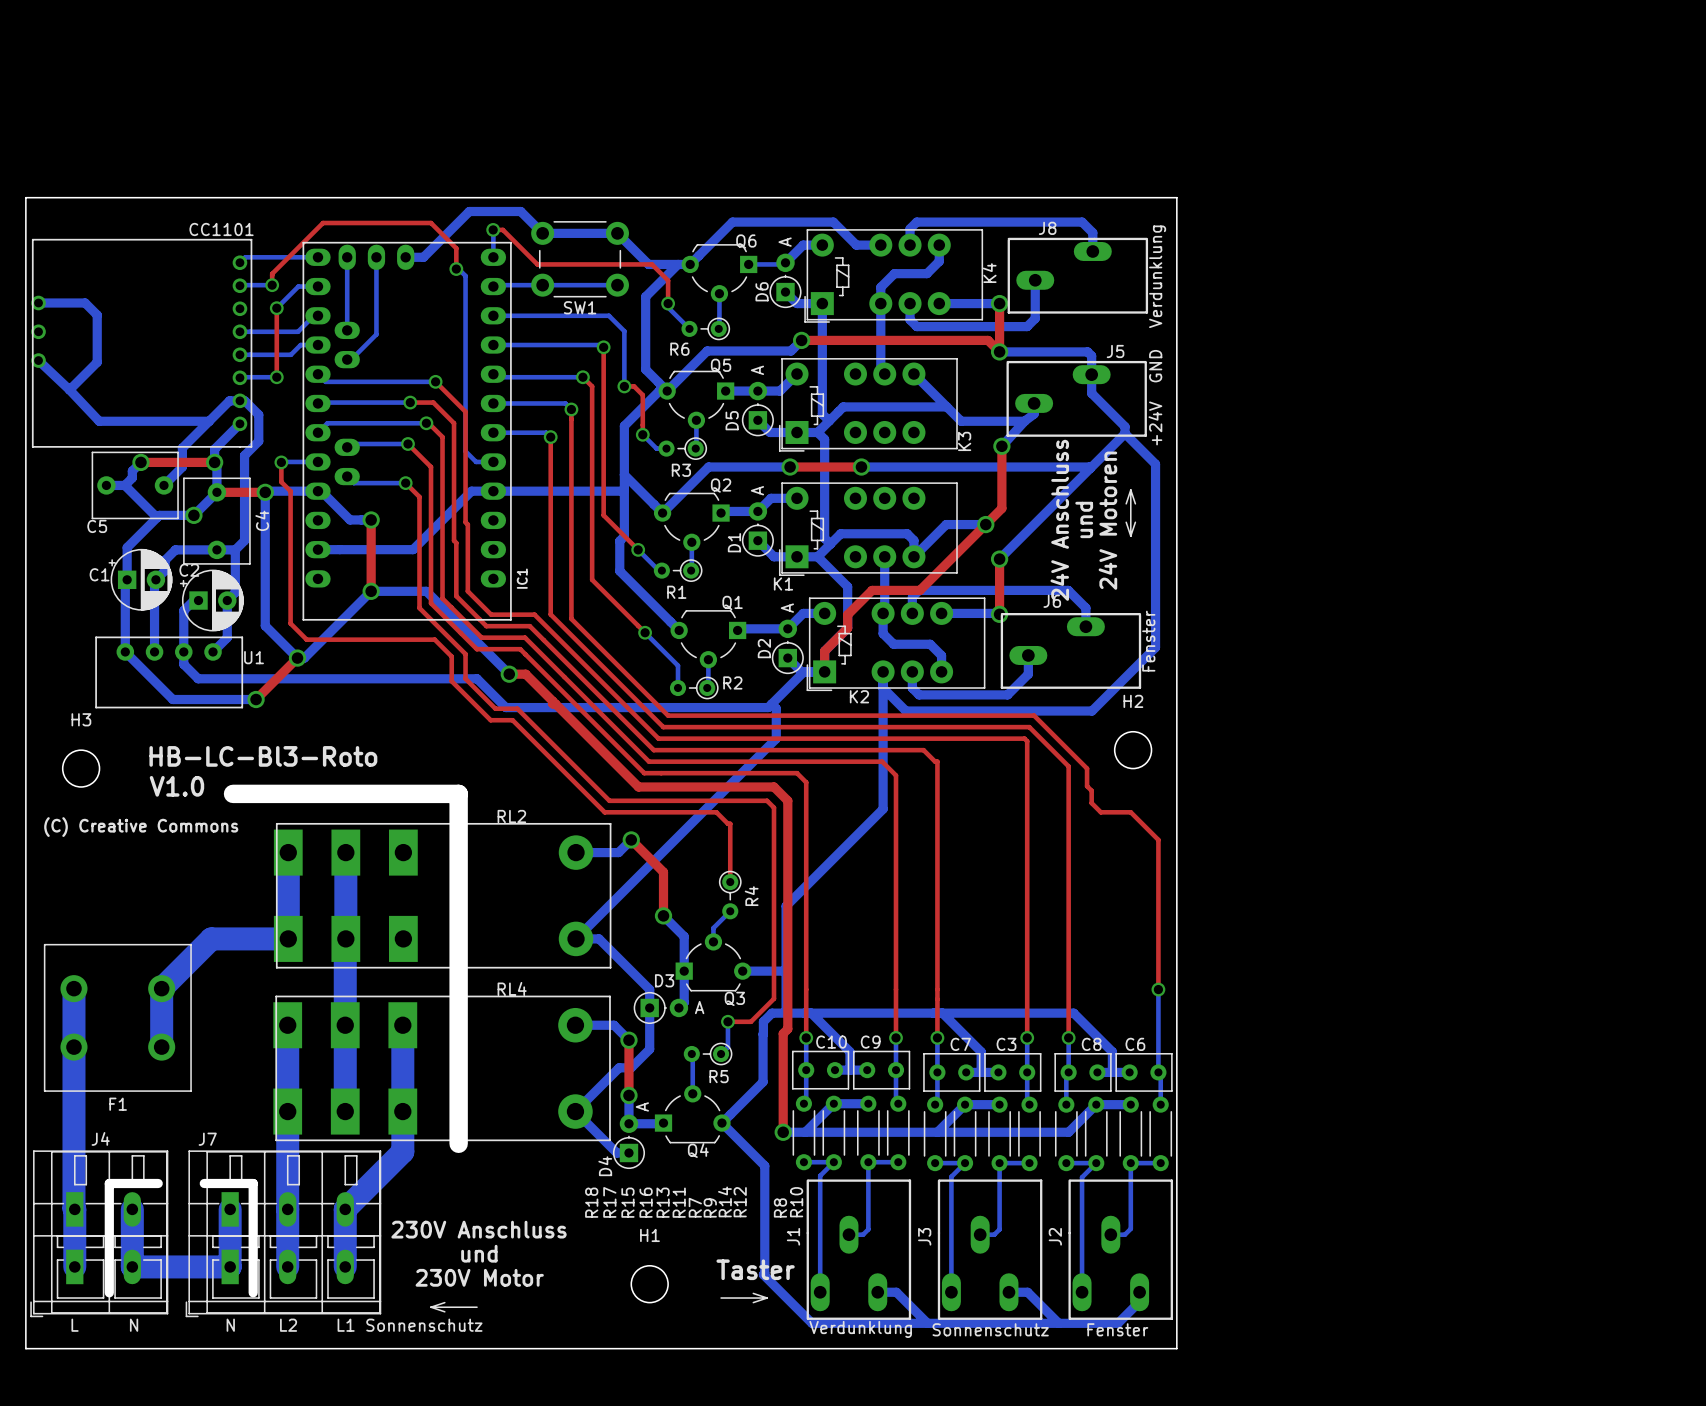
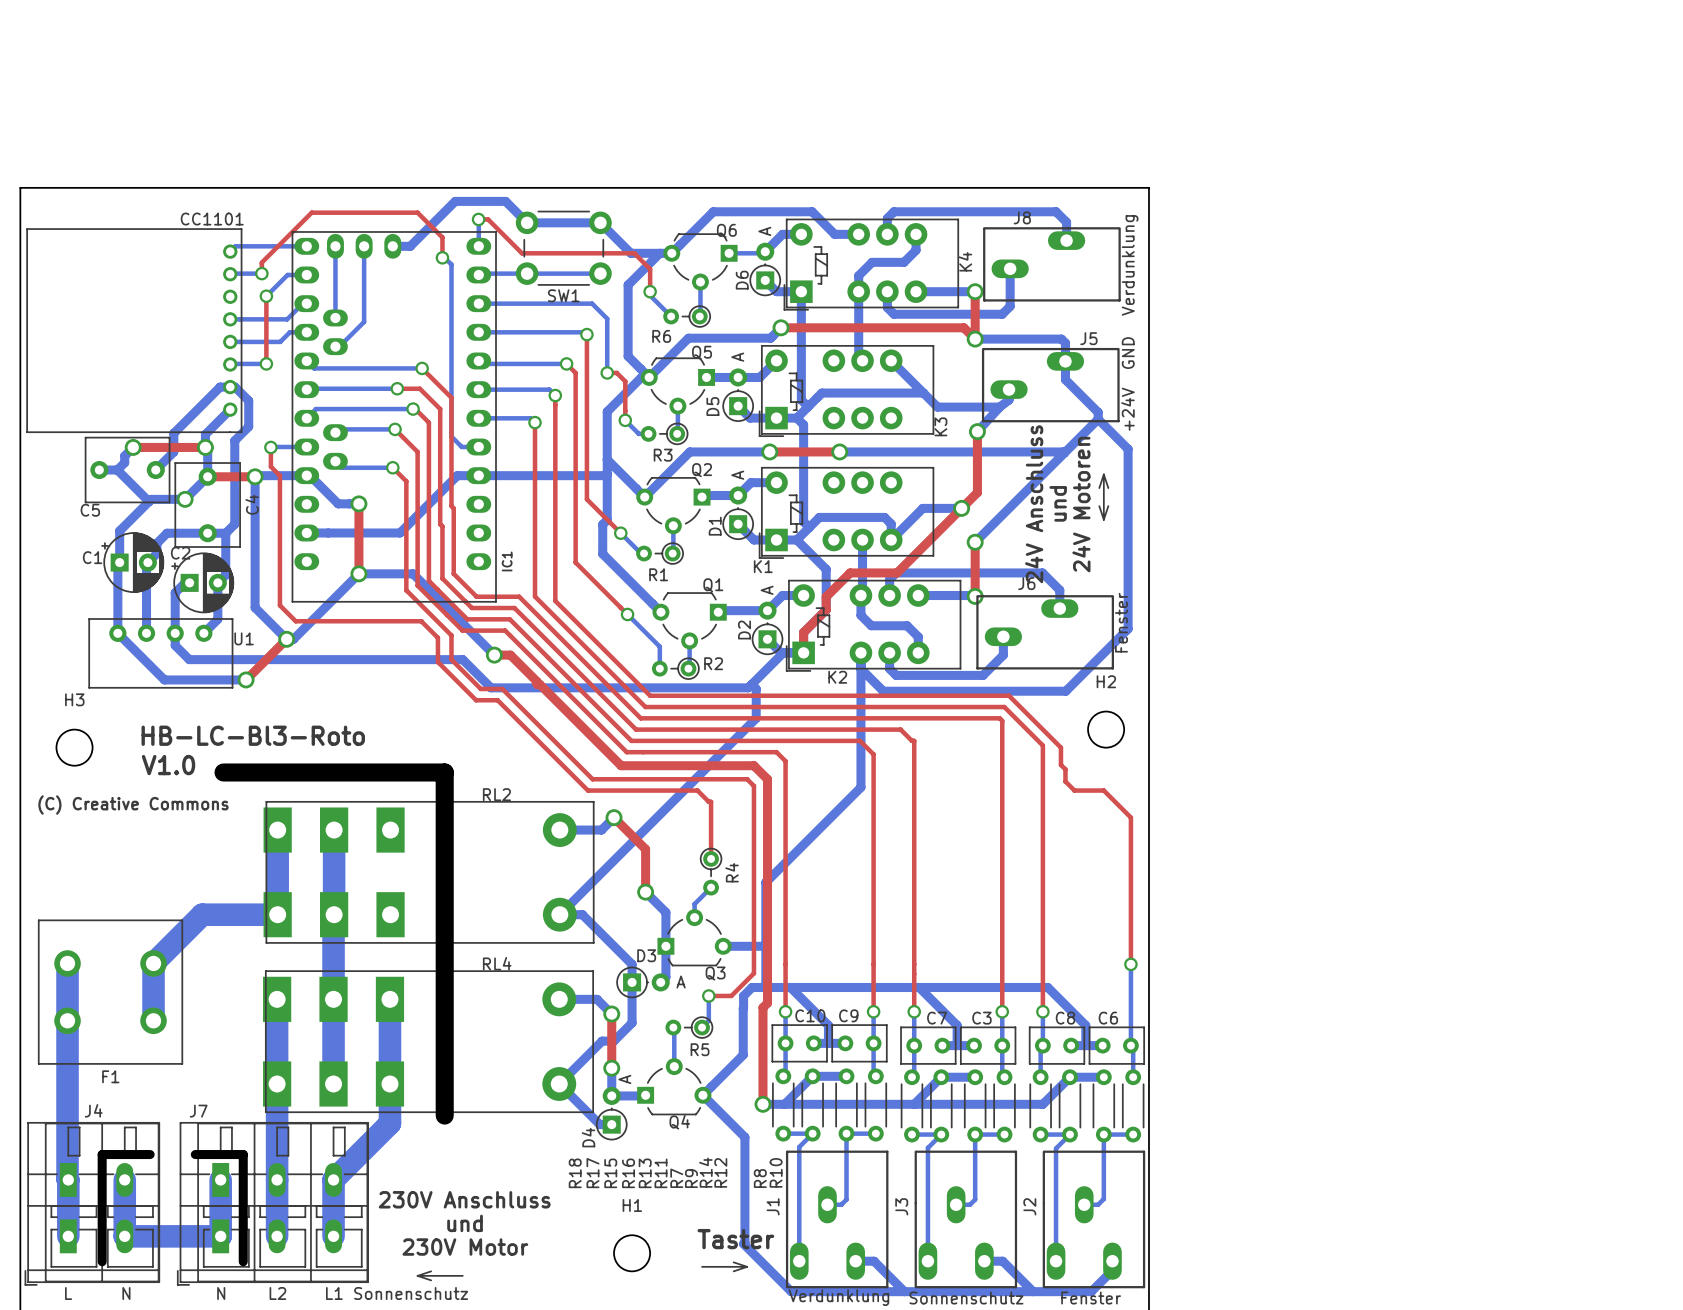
part footprint: [31, 238, 253, 448] -> [26, 228, 243, 434]
bottom track: (38, 303) (85, 303) (97, 315) (97, 362) (69, 389) -> none
bottom track: (38, 360) (69, 389) -> none
bottom track: (69, 389) (99, 421) (209, 421) -> none

